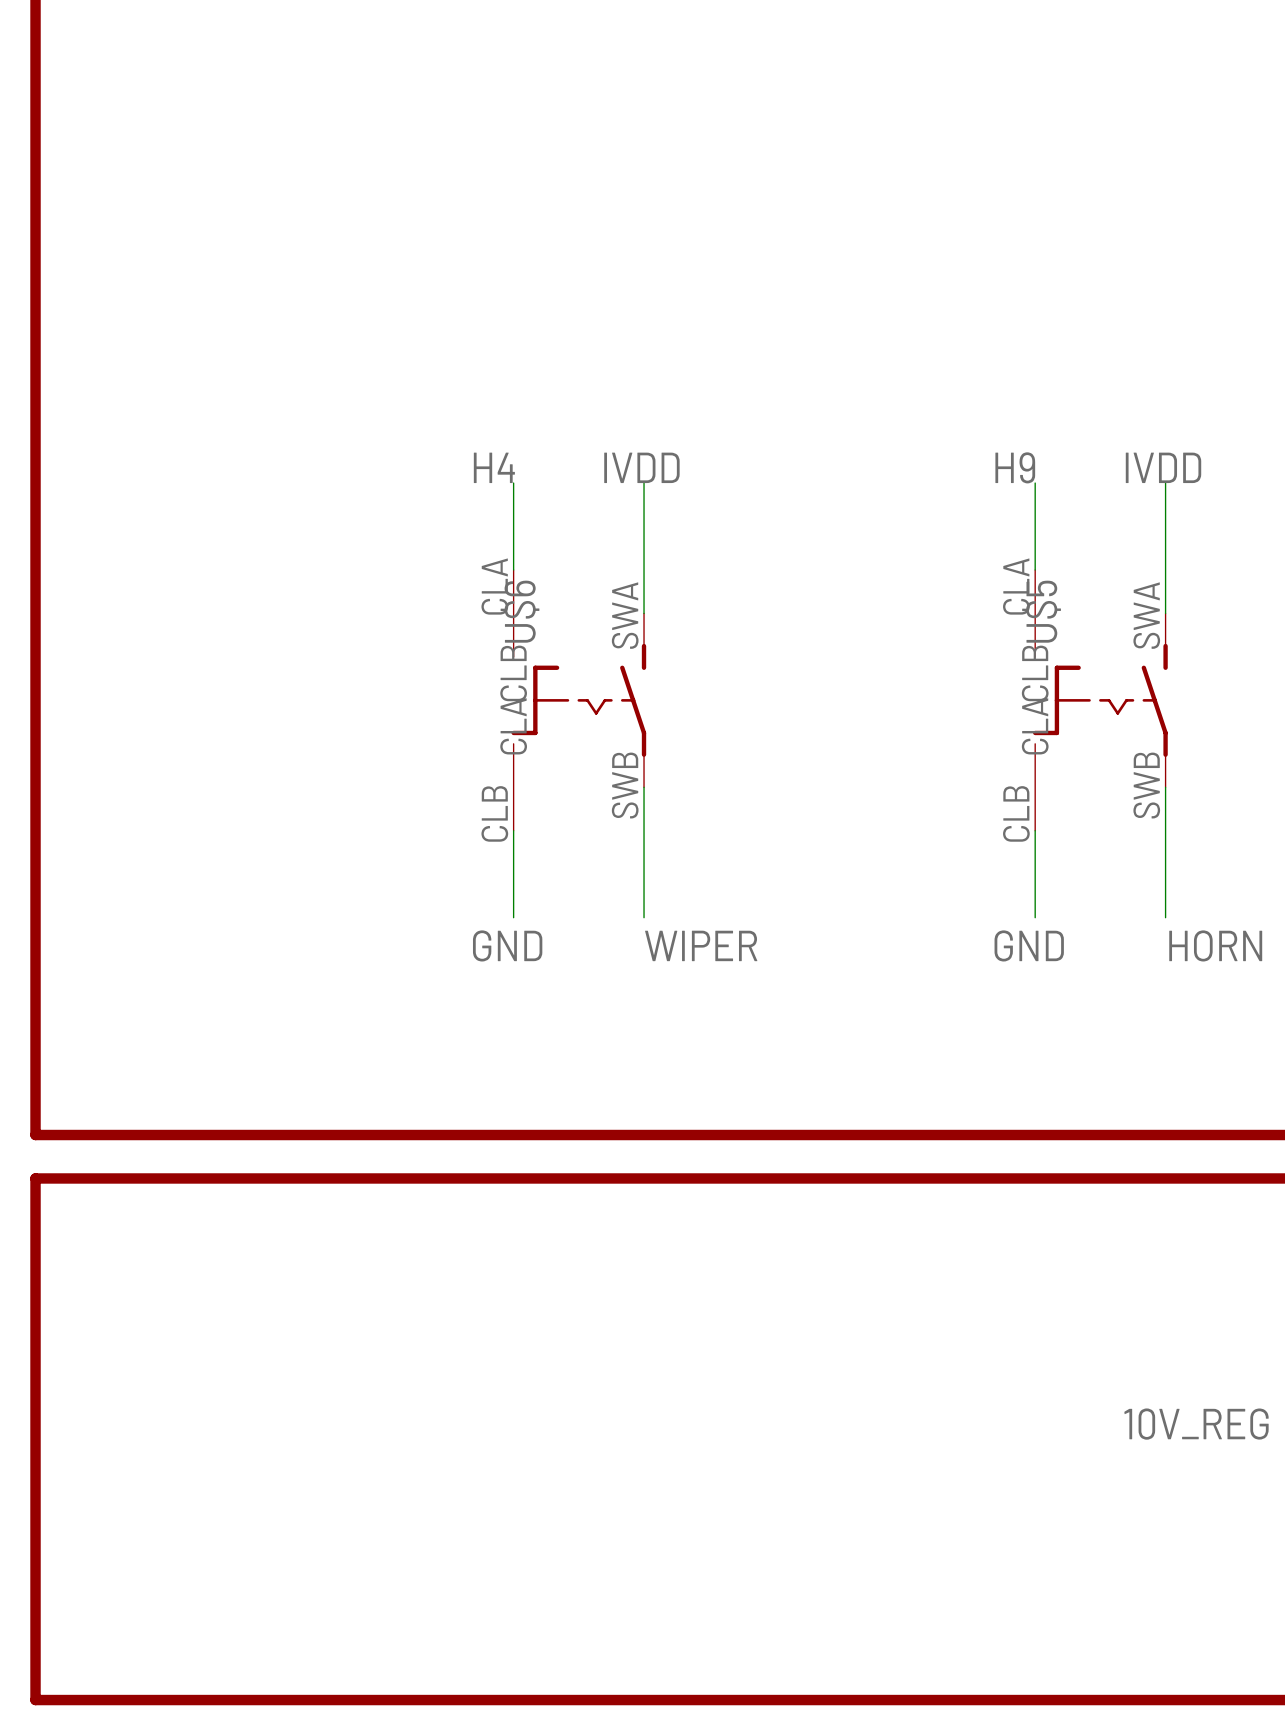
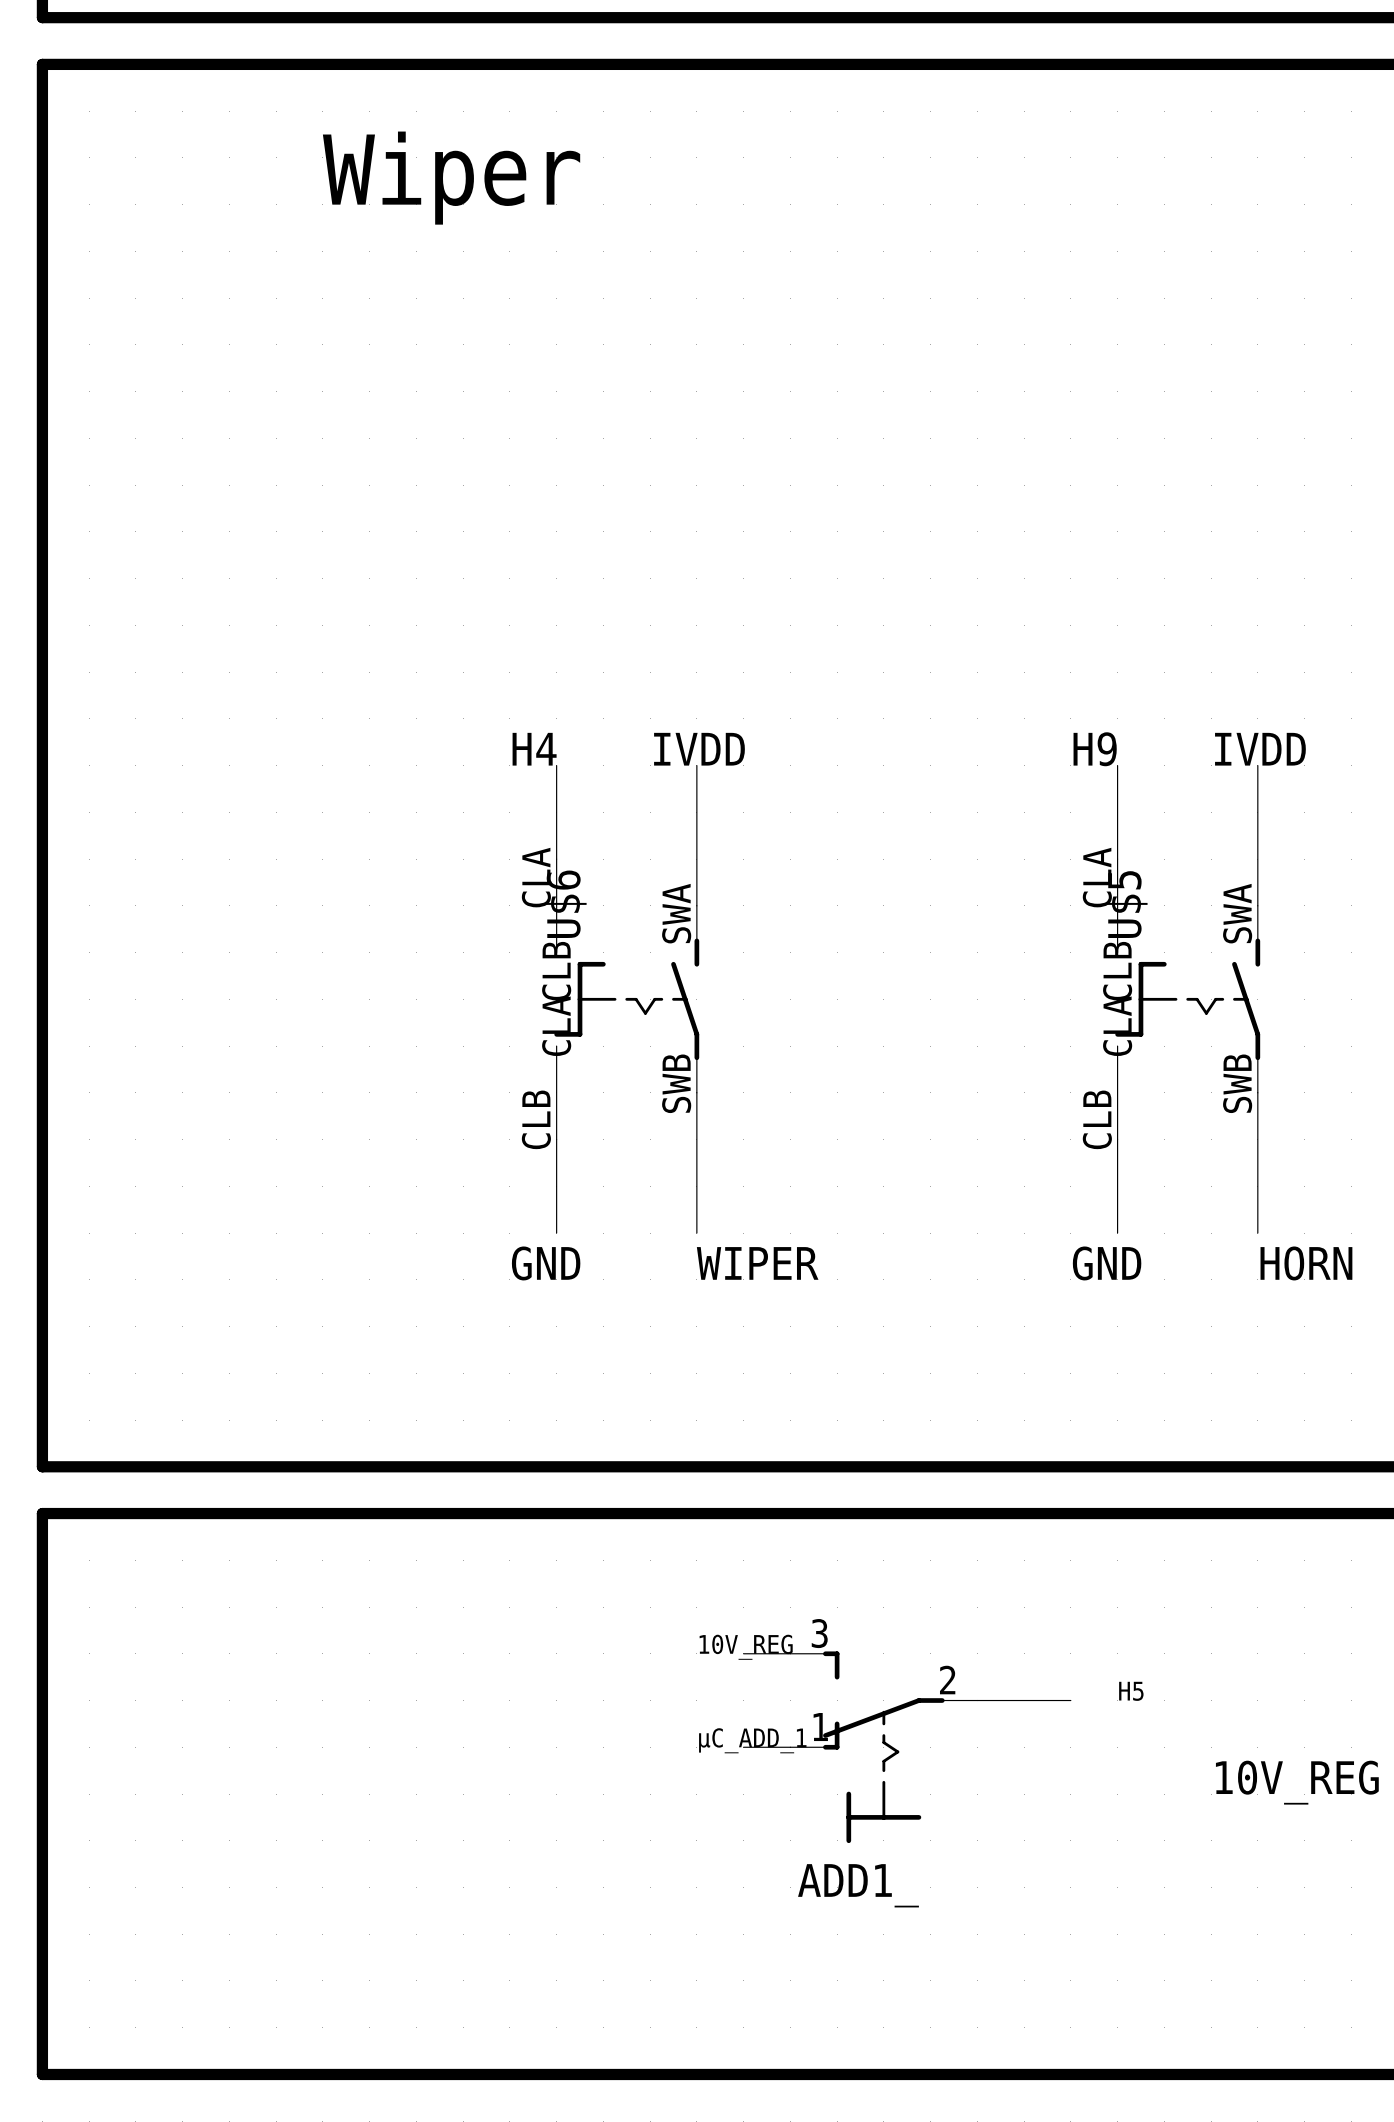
label: none -> 10V_REG (746, 1647)
wire: none -> (743, 1653) (790, 1653)
label: none -> H5 (1131, 1691)
wire: none -> (977, 1700) (1070, 1700)
label: none -> µC_ADD_1 (752, 1740)
wire: none -> (743, 1747) (790, 1747)
ADD1_: none -> (883, 1747)

